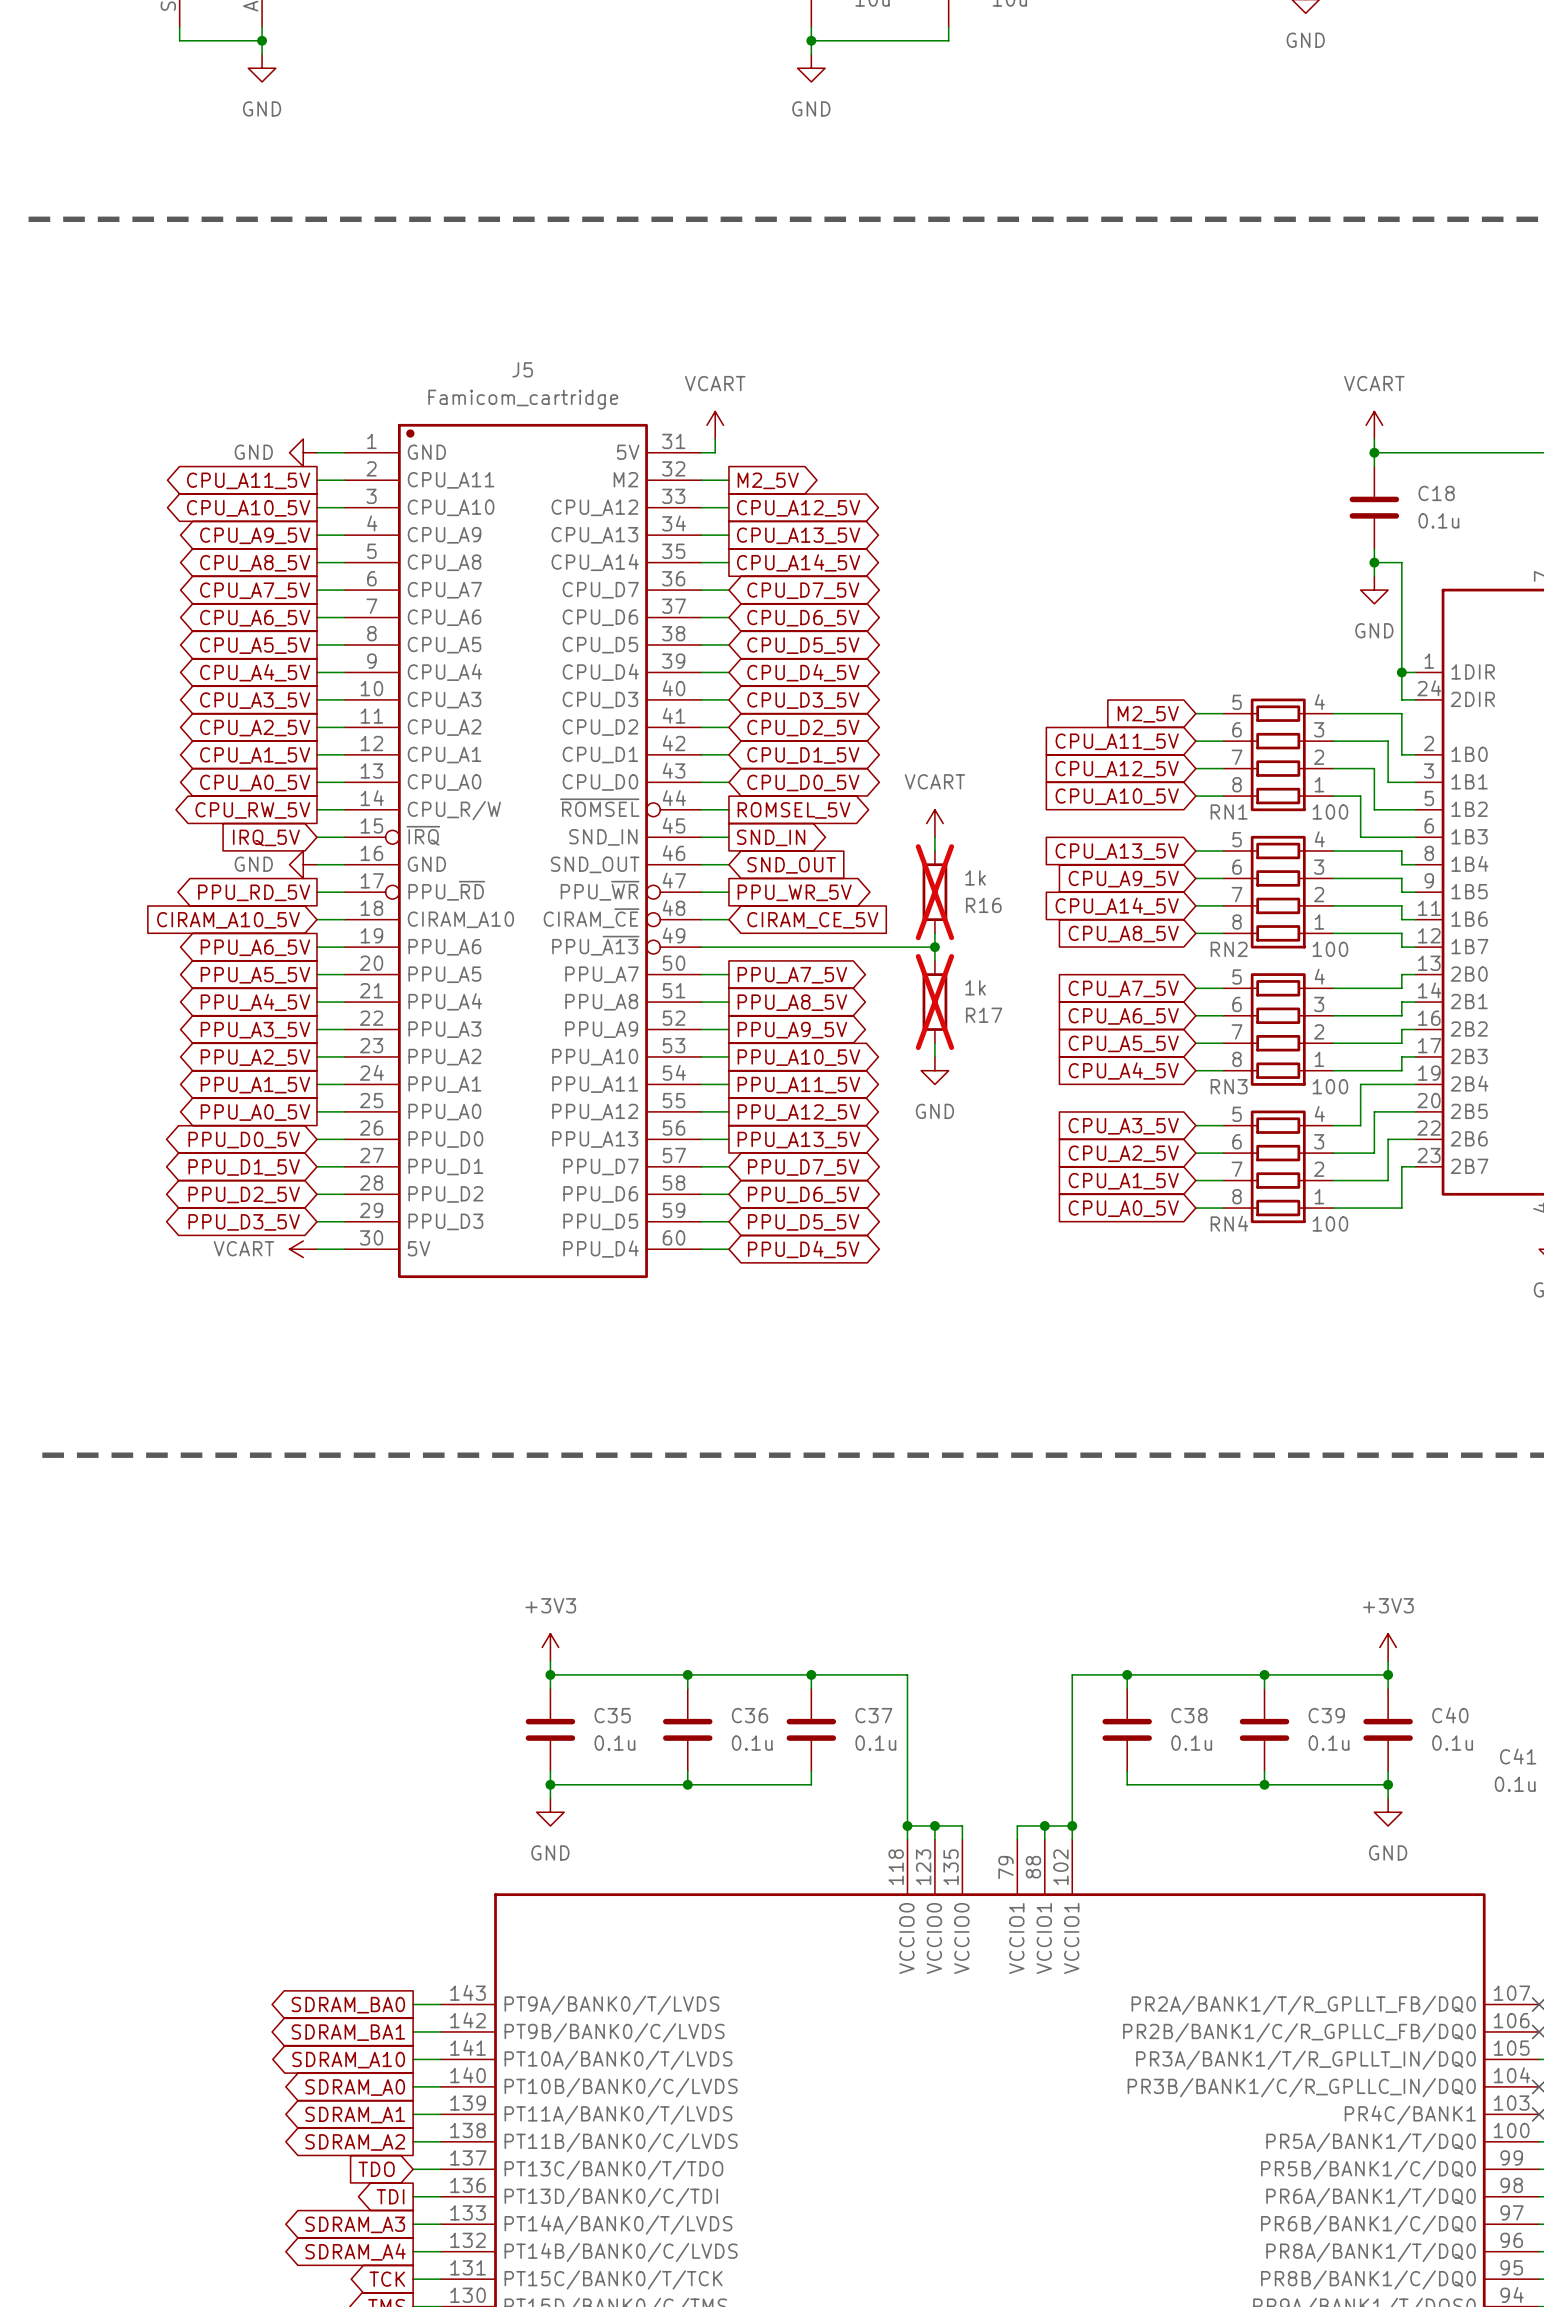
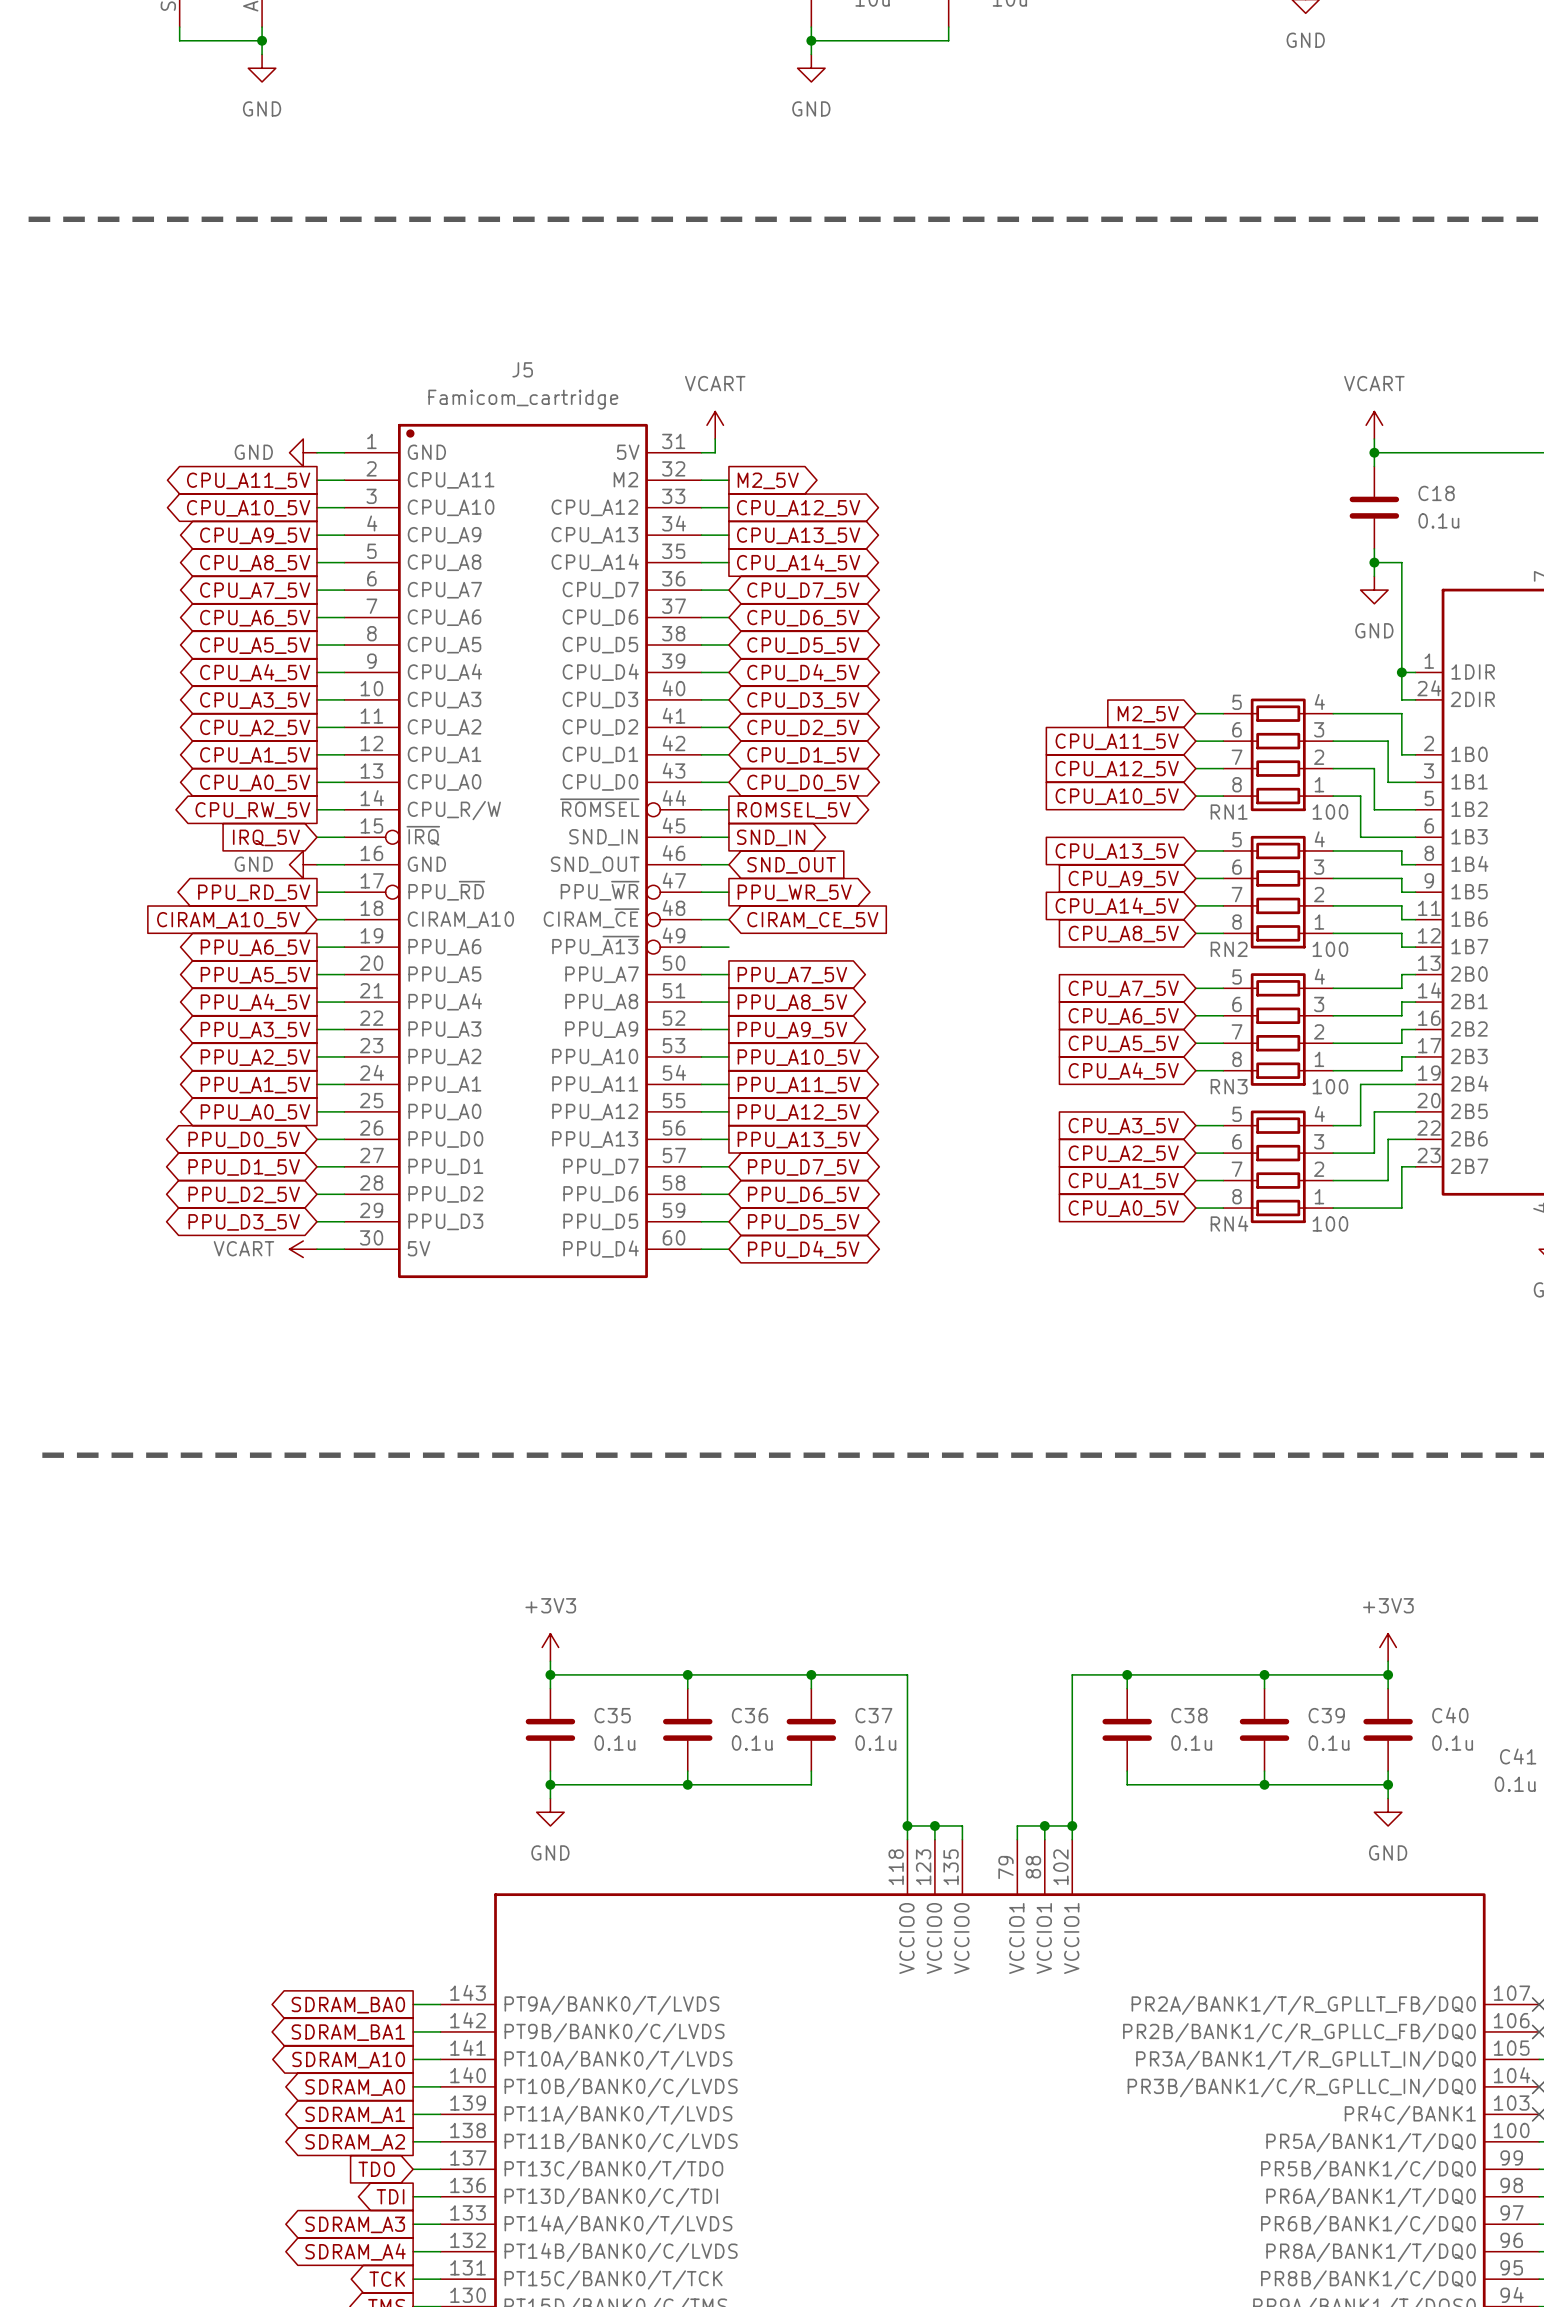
power symbol: VCART (934, 823) -> none
wire: (934, 837) (934, 850) -> none
R16: 1k (934, 892) -> none
wire: (934, 933) (934, 960) -> none
wire: (728, 947) (934, 947) -> none
junction: (934, 947) -> none
R17: 1k (934, 1002) -> none
wire: (934, 1043) (934, 1056) -> none
power symbol: GND (934, 1070) -> none

